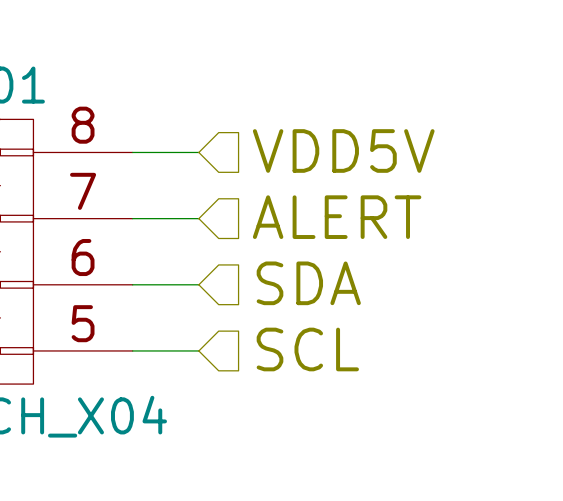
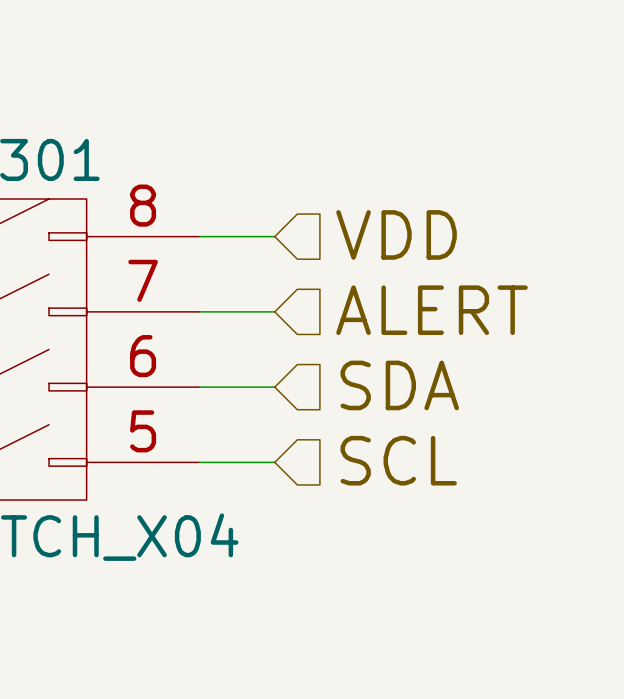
hierarchical label: VDD5V (343, 150) -> VDD (396, 234)

